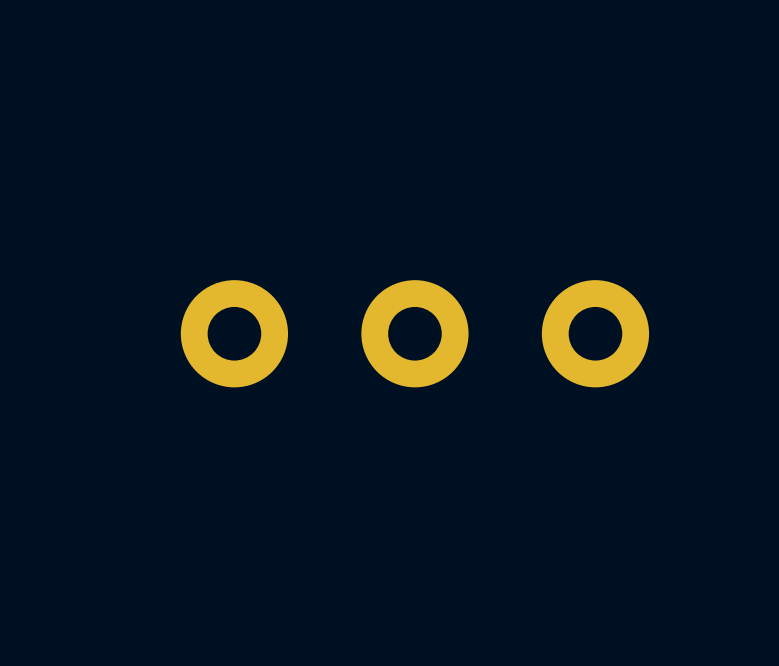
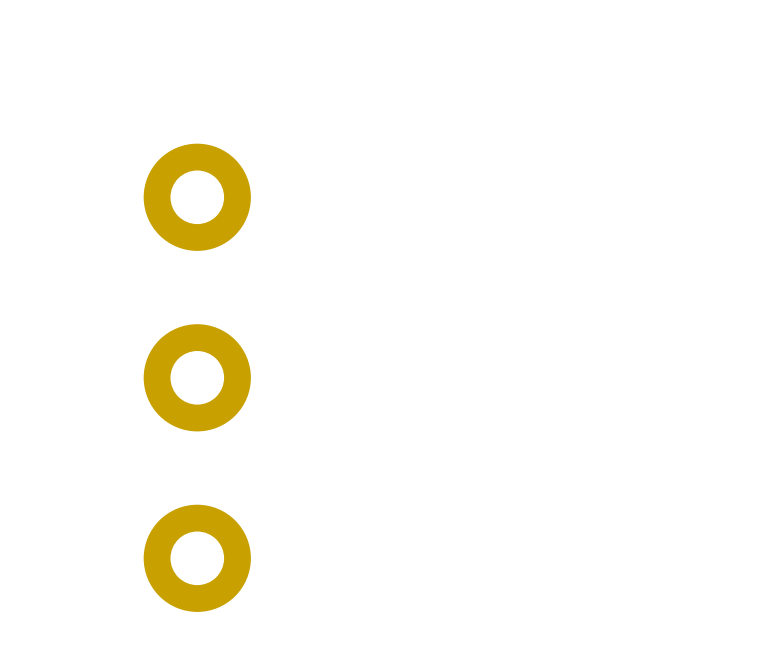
part rotation: 0° (414, 333) -> 90° clockwise (197, 377)

